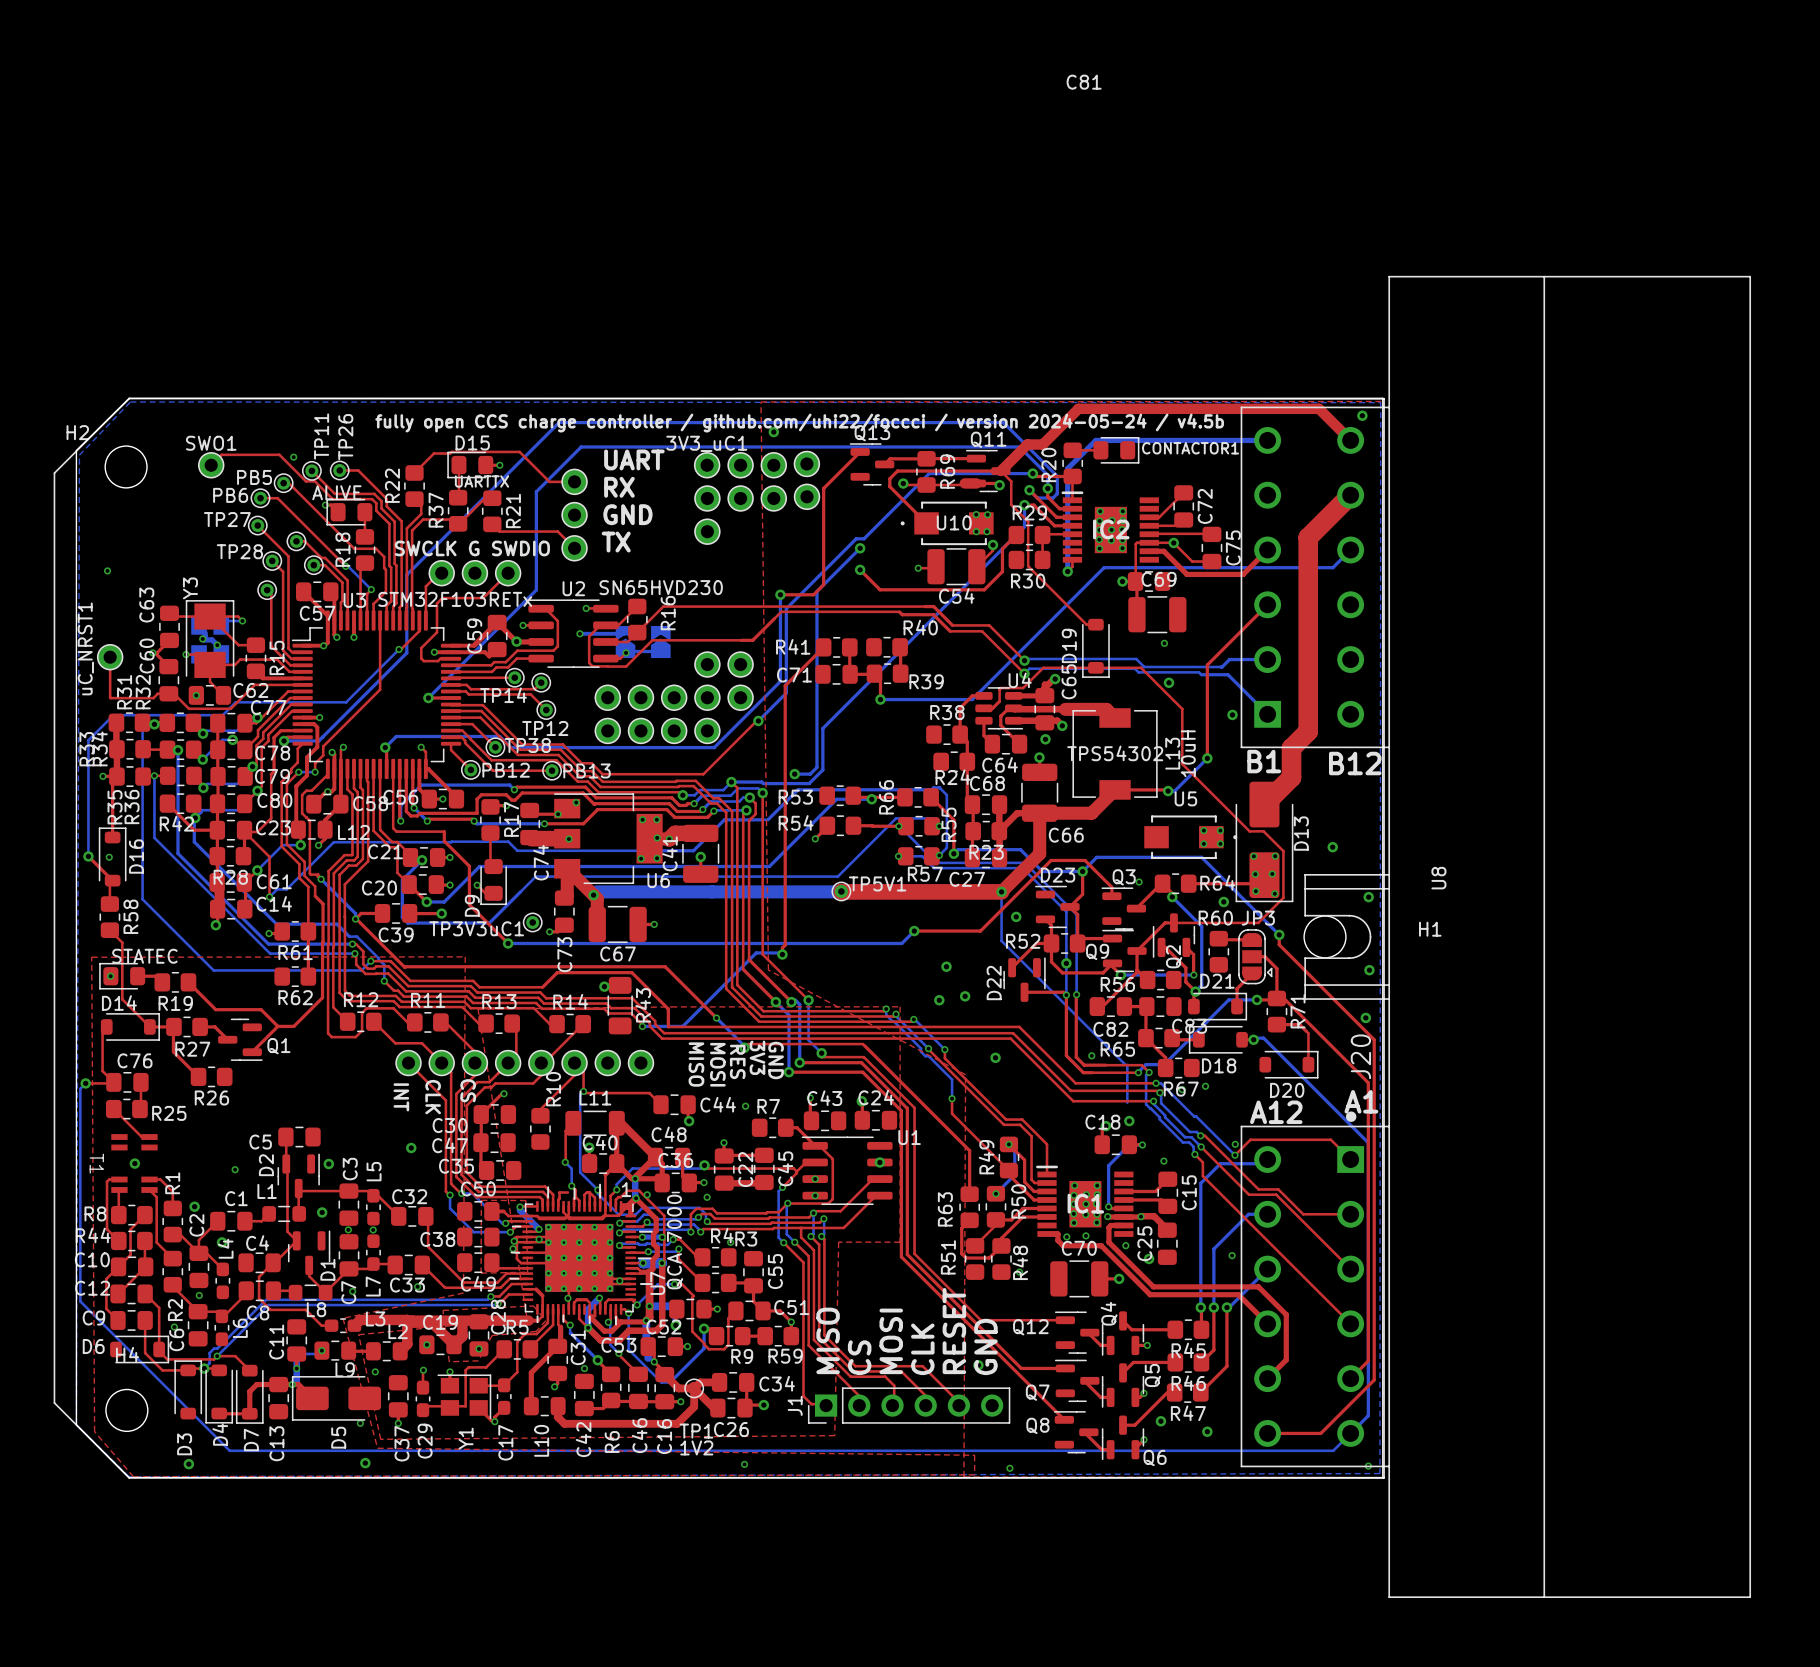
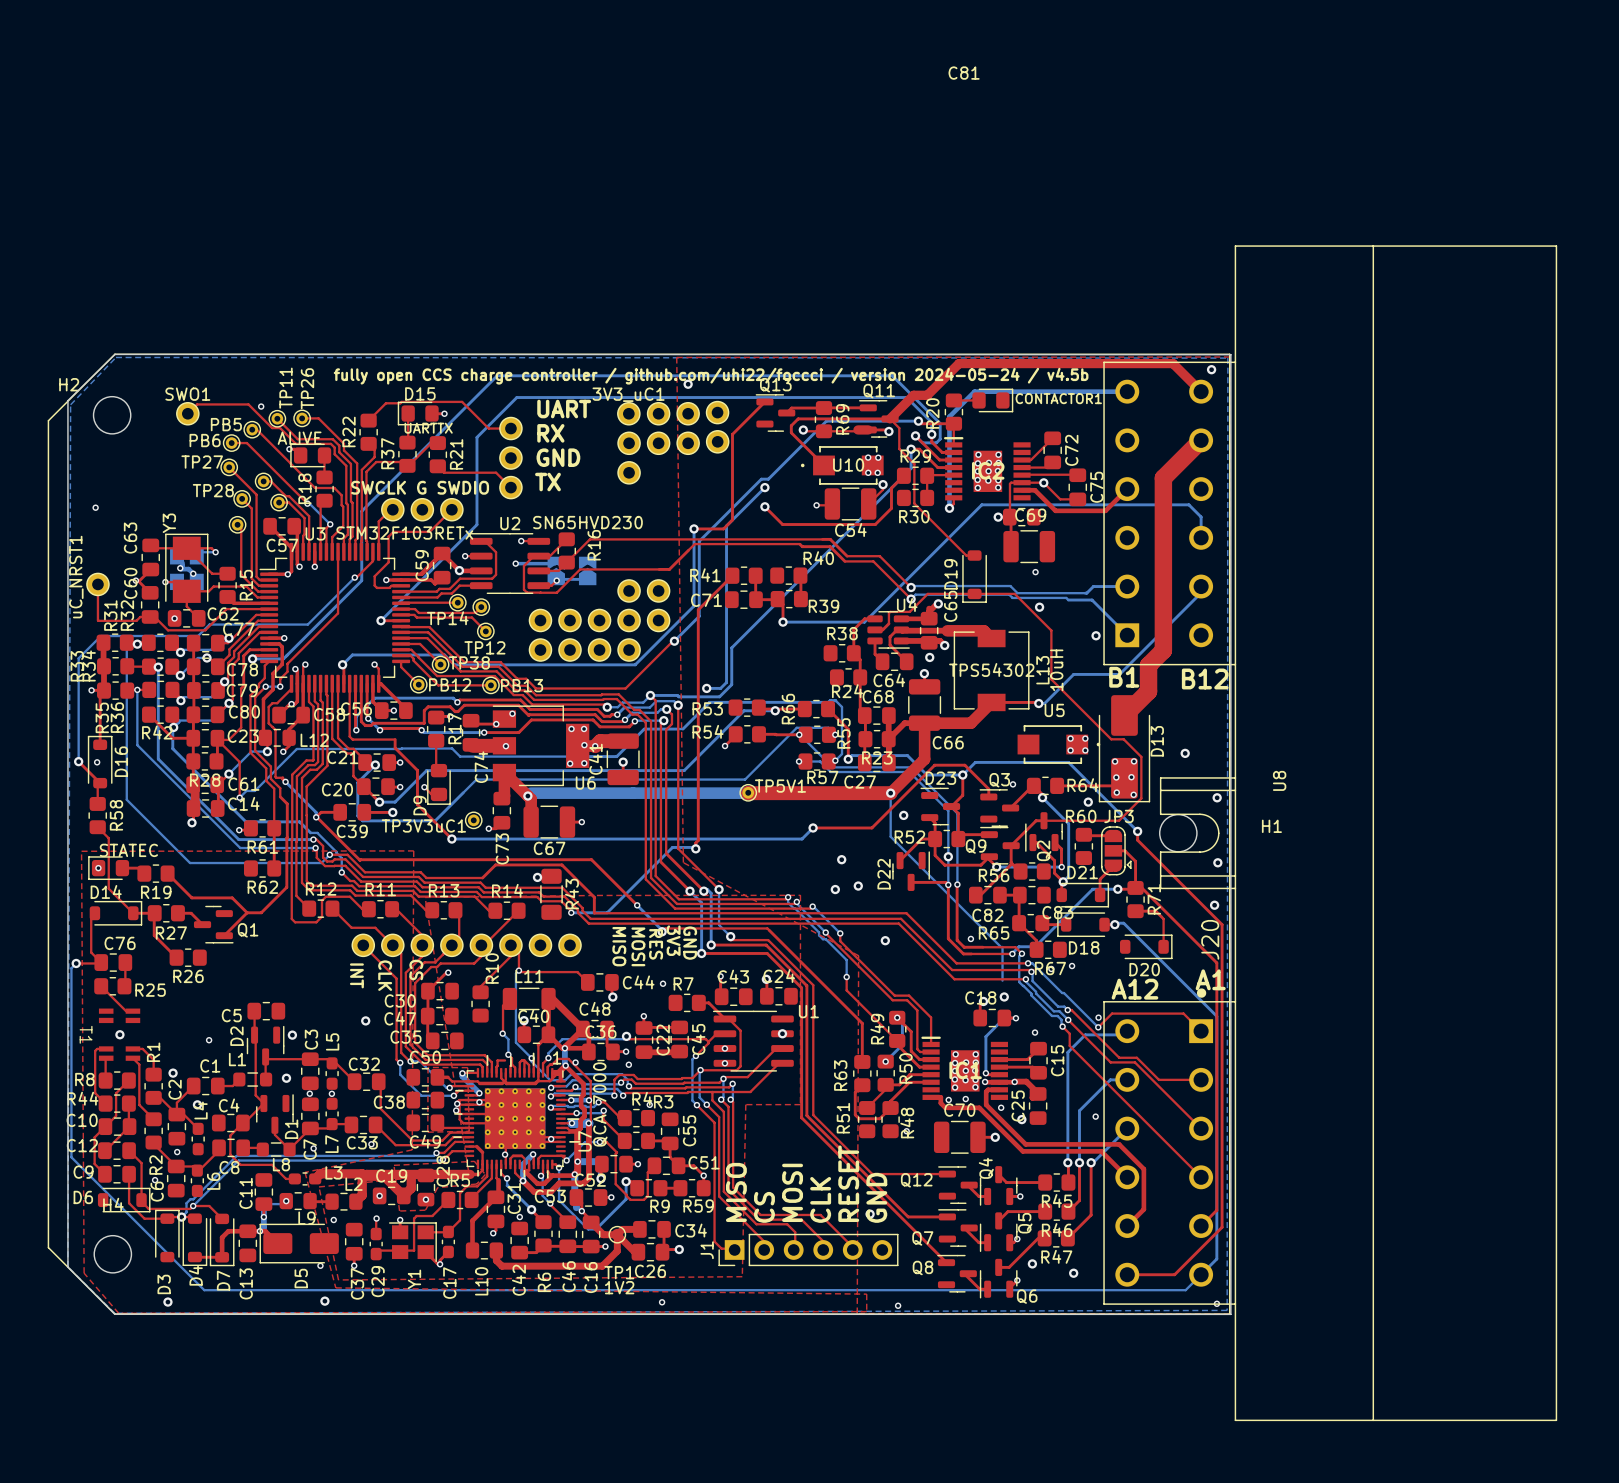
bottom track: (1350, 549) (1332, 567) -> (1201, 537) (1201, 517) (1188, 504) (1185, 504)
top track: (1267, 604) (1207, 665) (1207, 758) -> none
bottom track: none -> (1201, 586) (1201, 592) (1119, 674) (1073, 674)
via: (1207, 758) -> none

